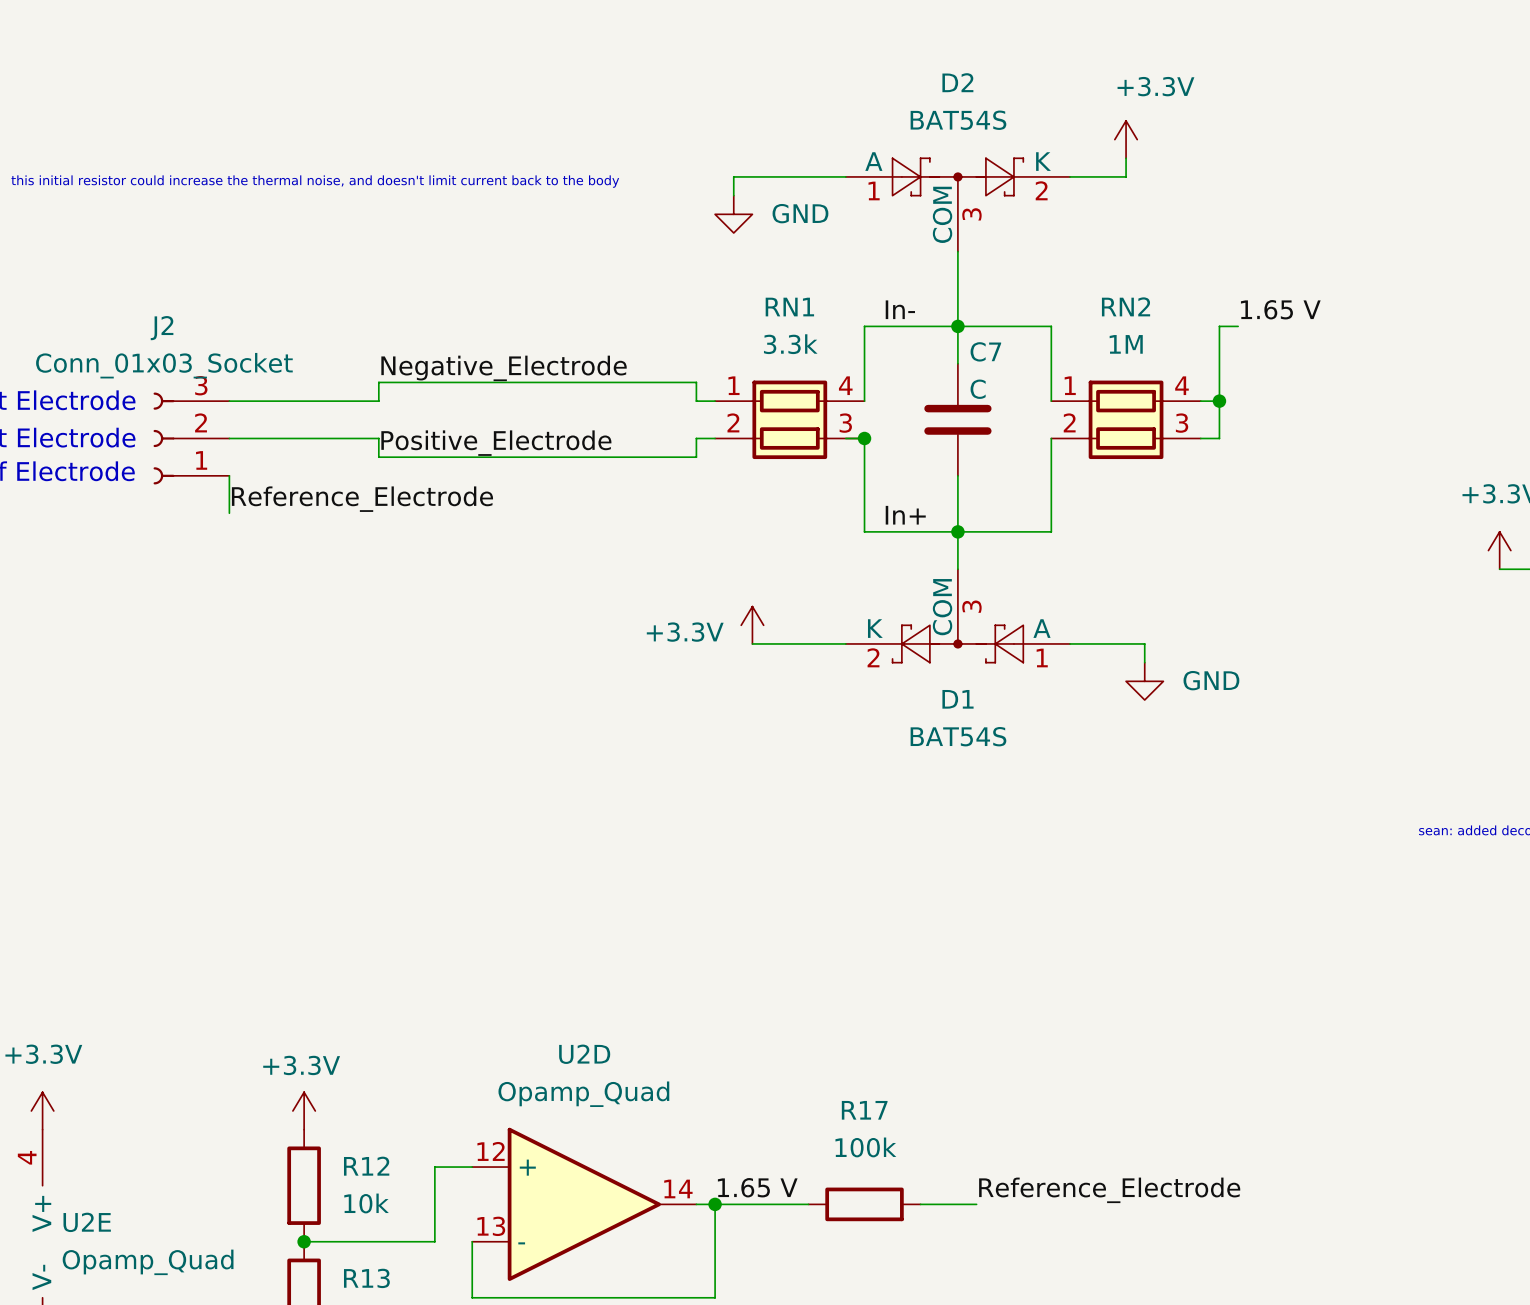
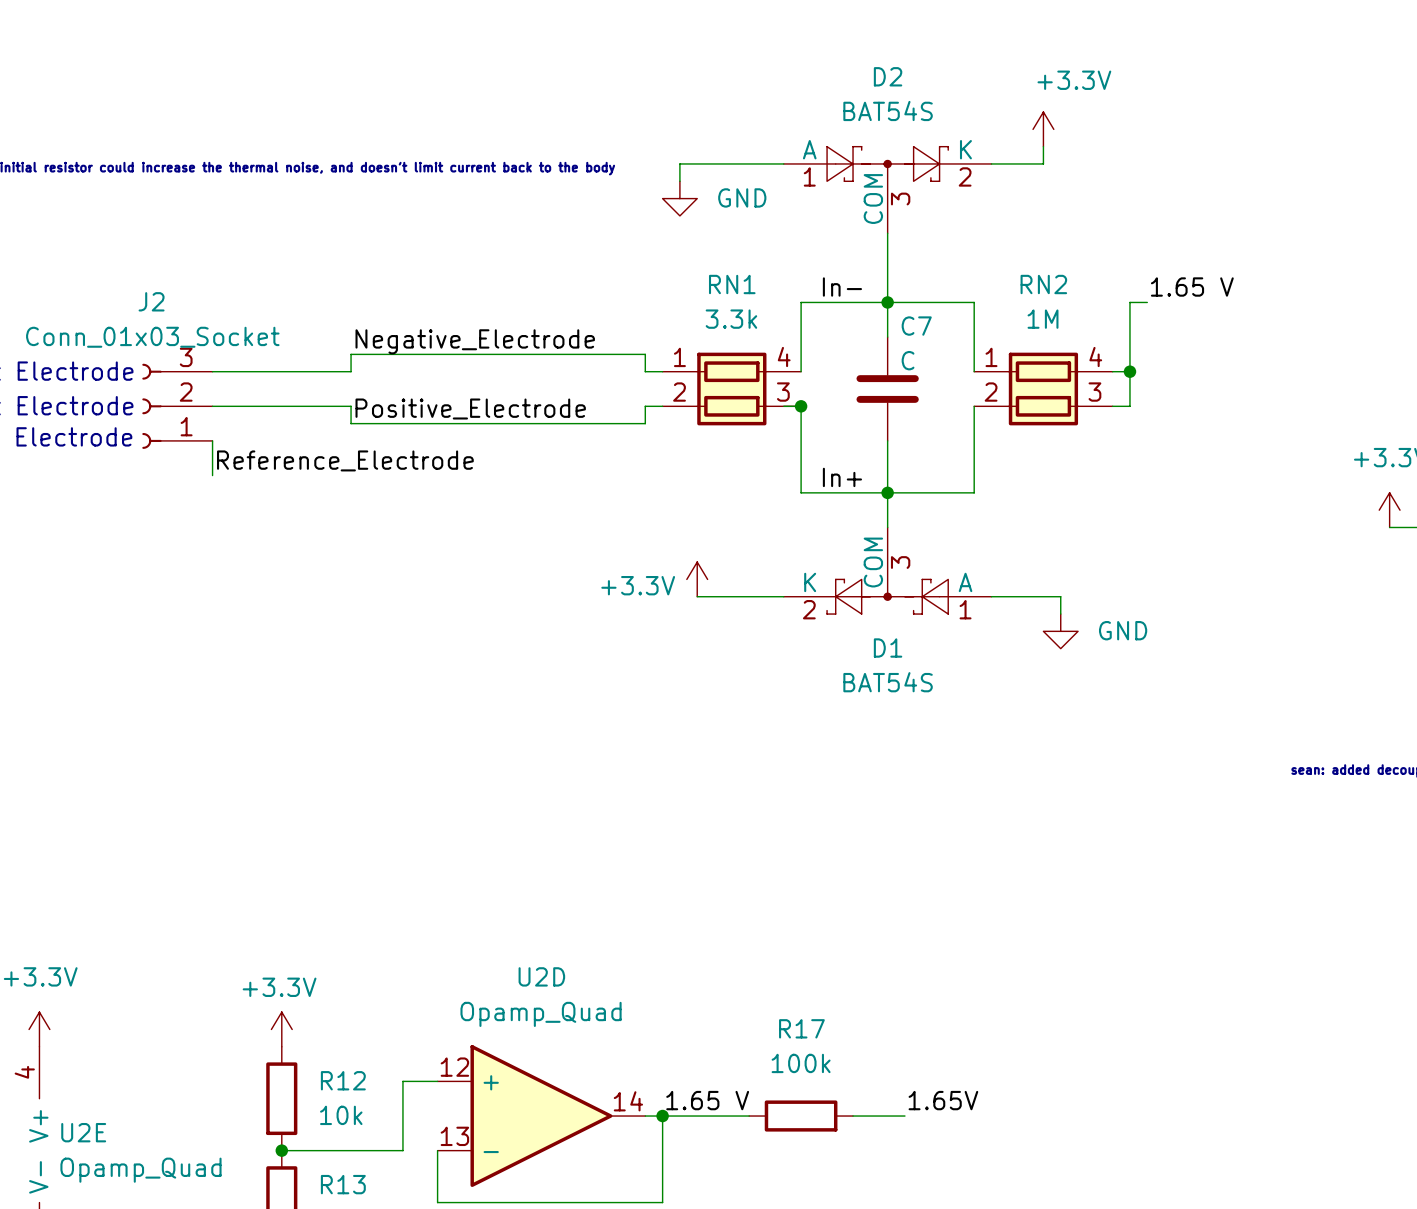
label: Reference_Electrode (1109, 1190) -> 1.65V (943, 1100)

